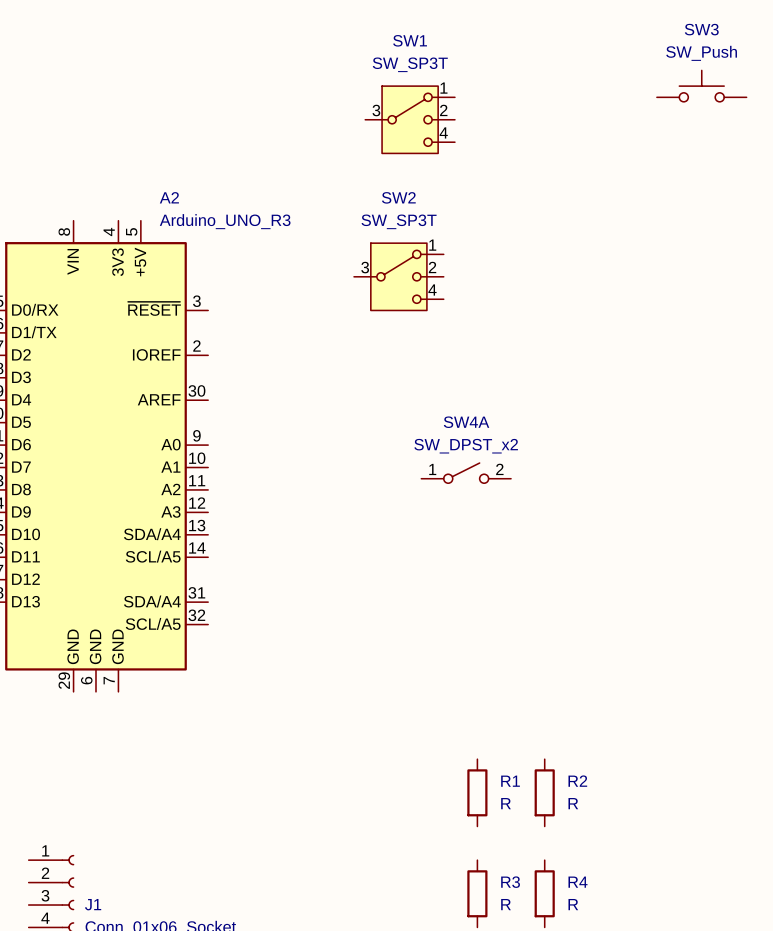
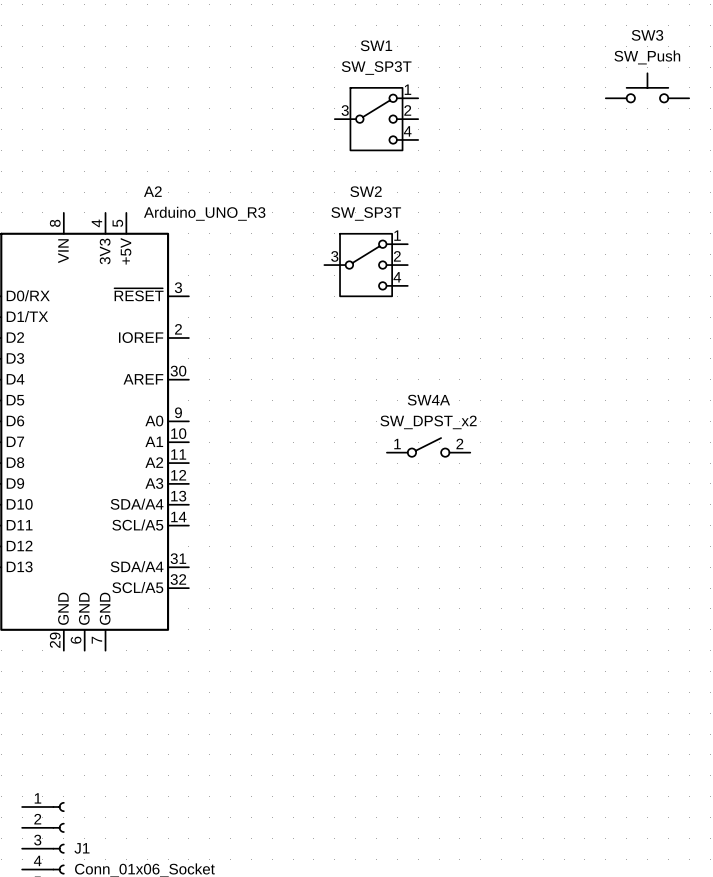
R1: R (477, 792) -> none
R2: R (544, 792) -> none
R3: R (477, 893) -> none
R4: R (544, 893) -> none

